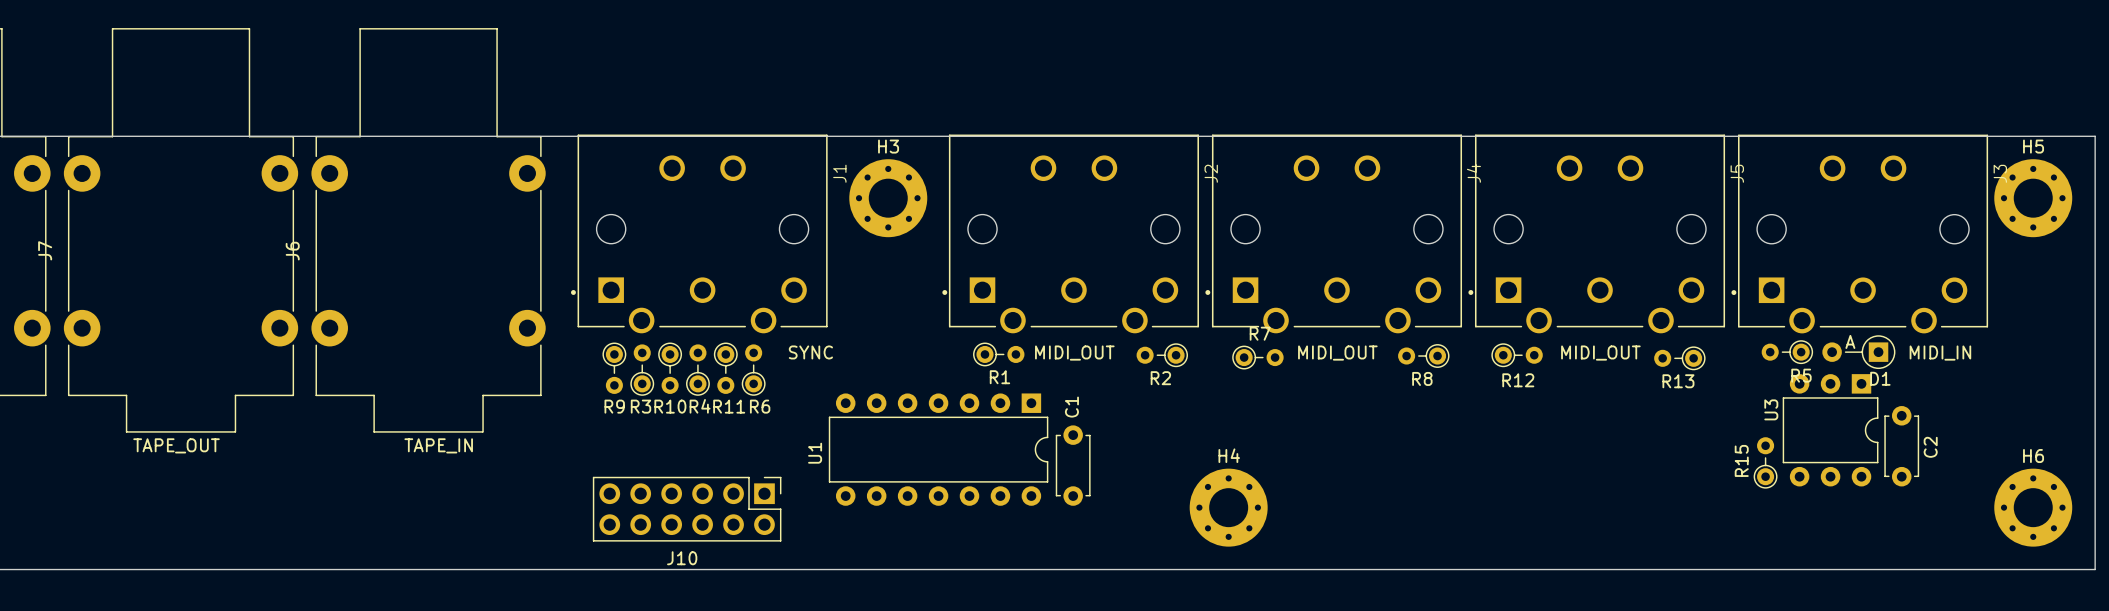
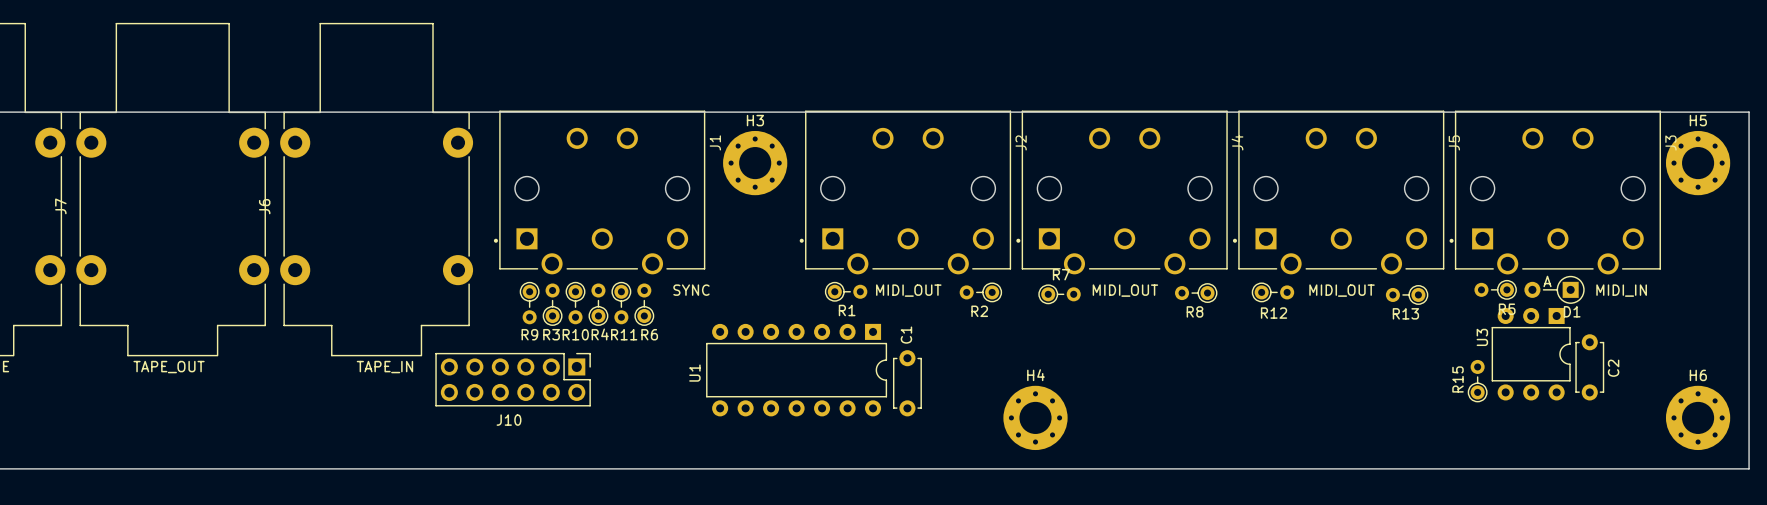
J10 position: (687, 509) -> (513, 379)

